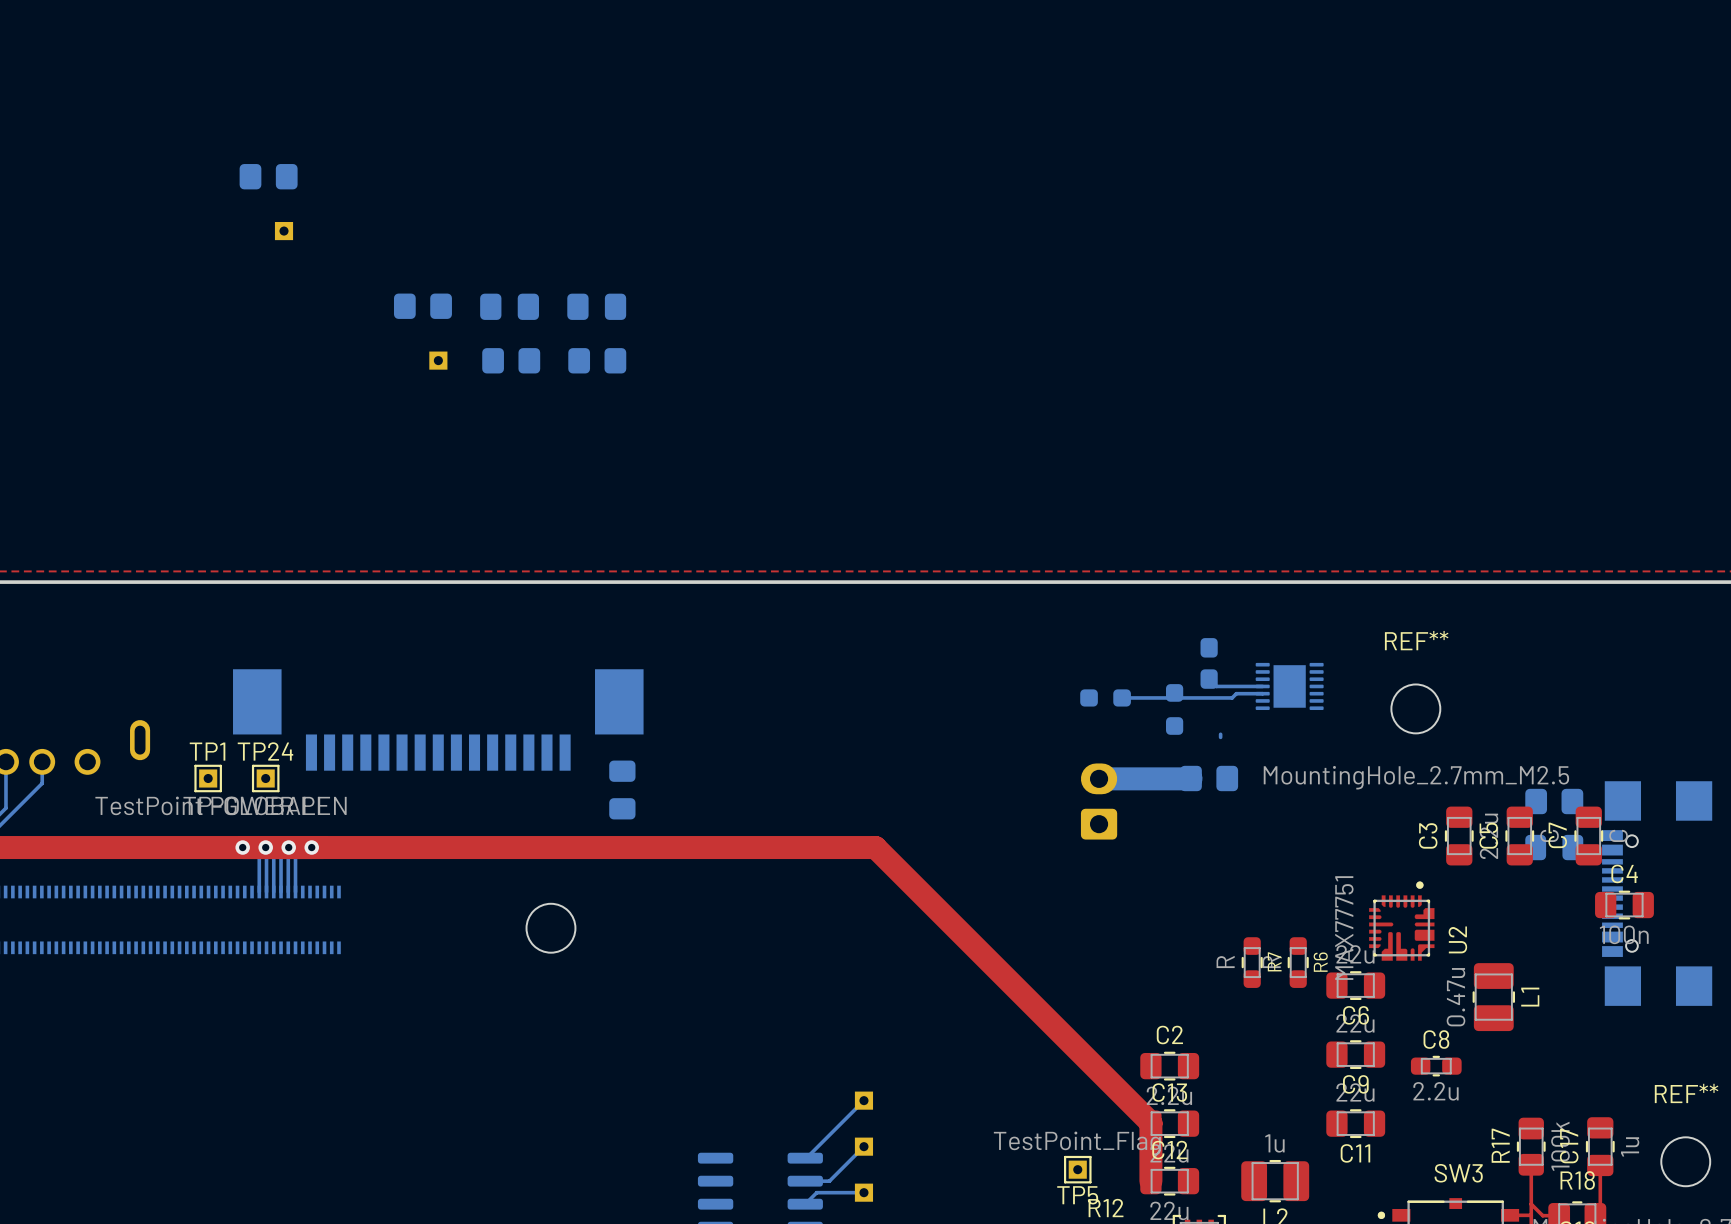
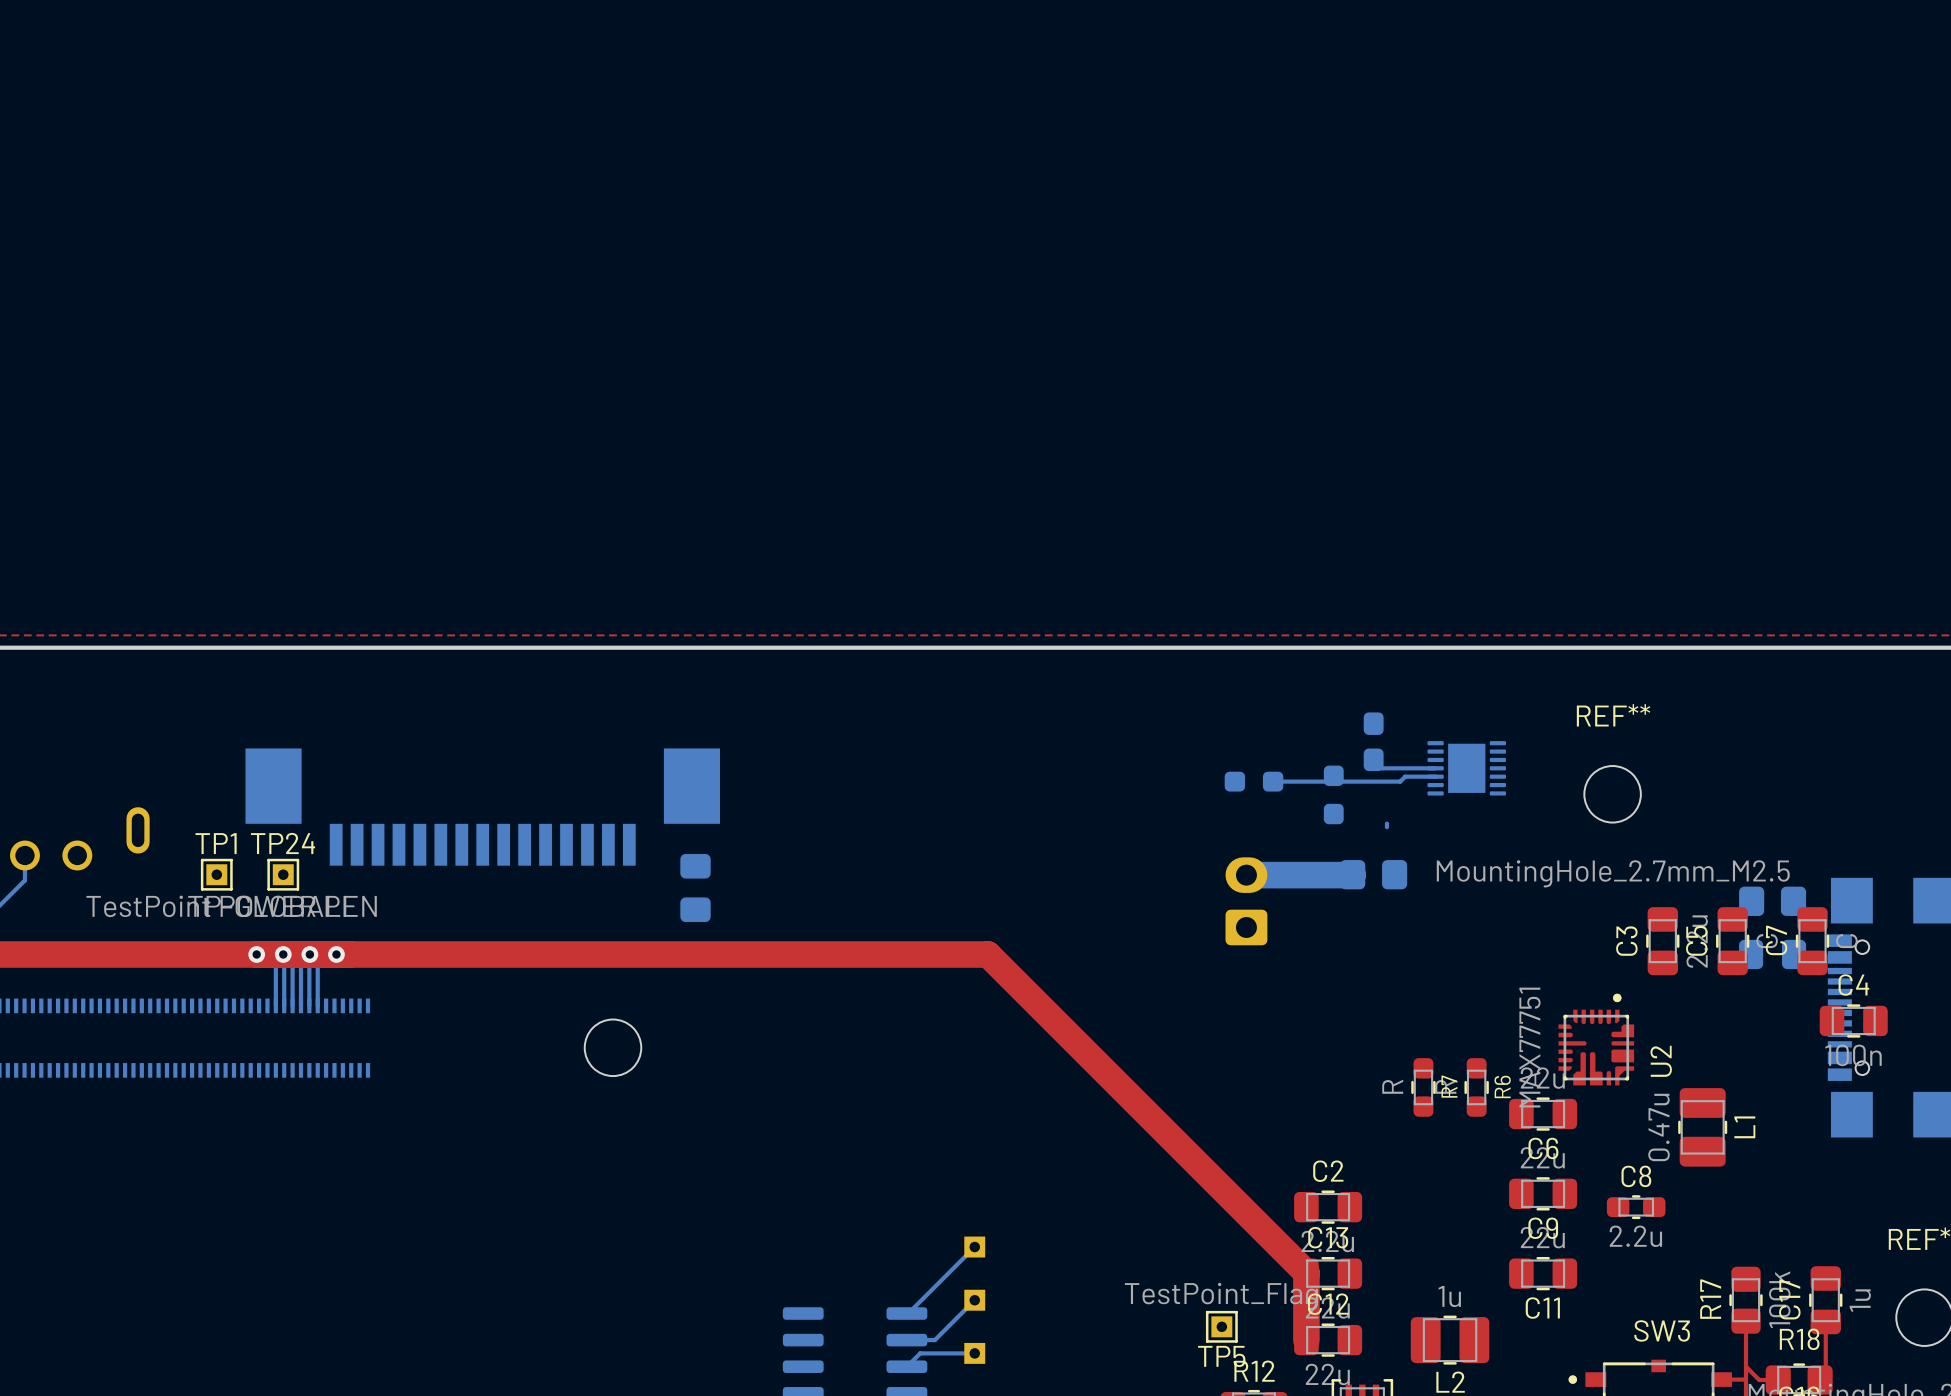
part: (268, 176) -> none
part: (284, 231) -> none
part: (422, 306) -> none
part: (509, 306) -> none
part: (596, 306) -> none
part: (438, 360) -> none
part: (511, 360) -> none
part: (597, 360) -> none

